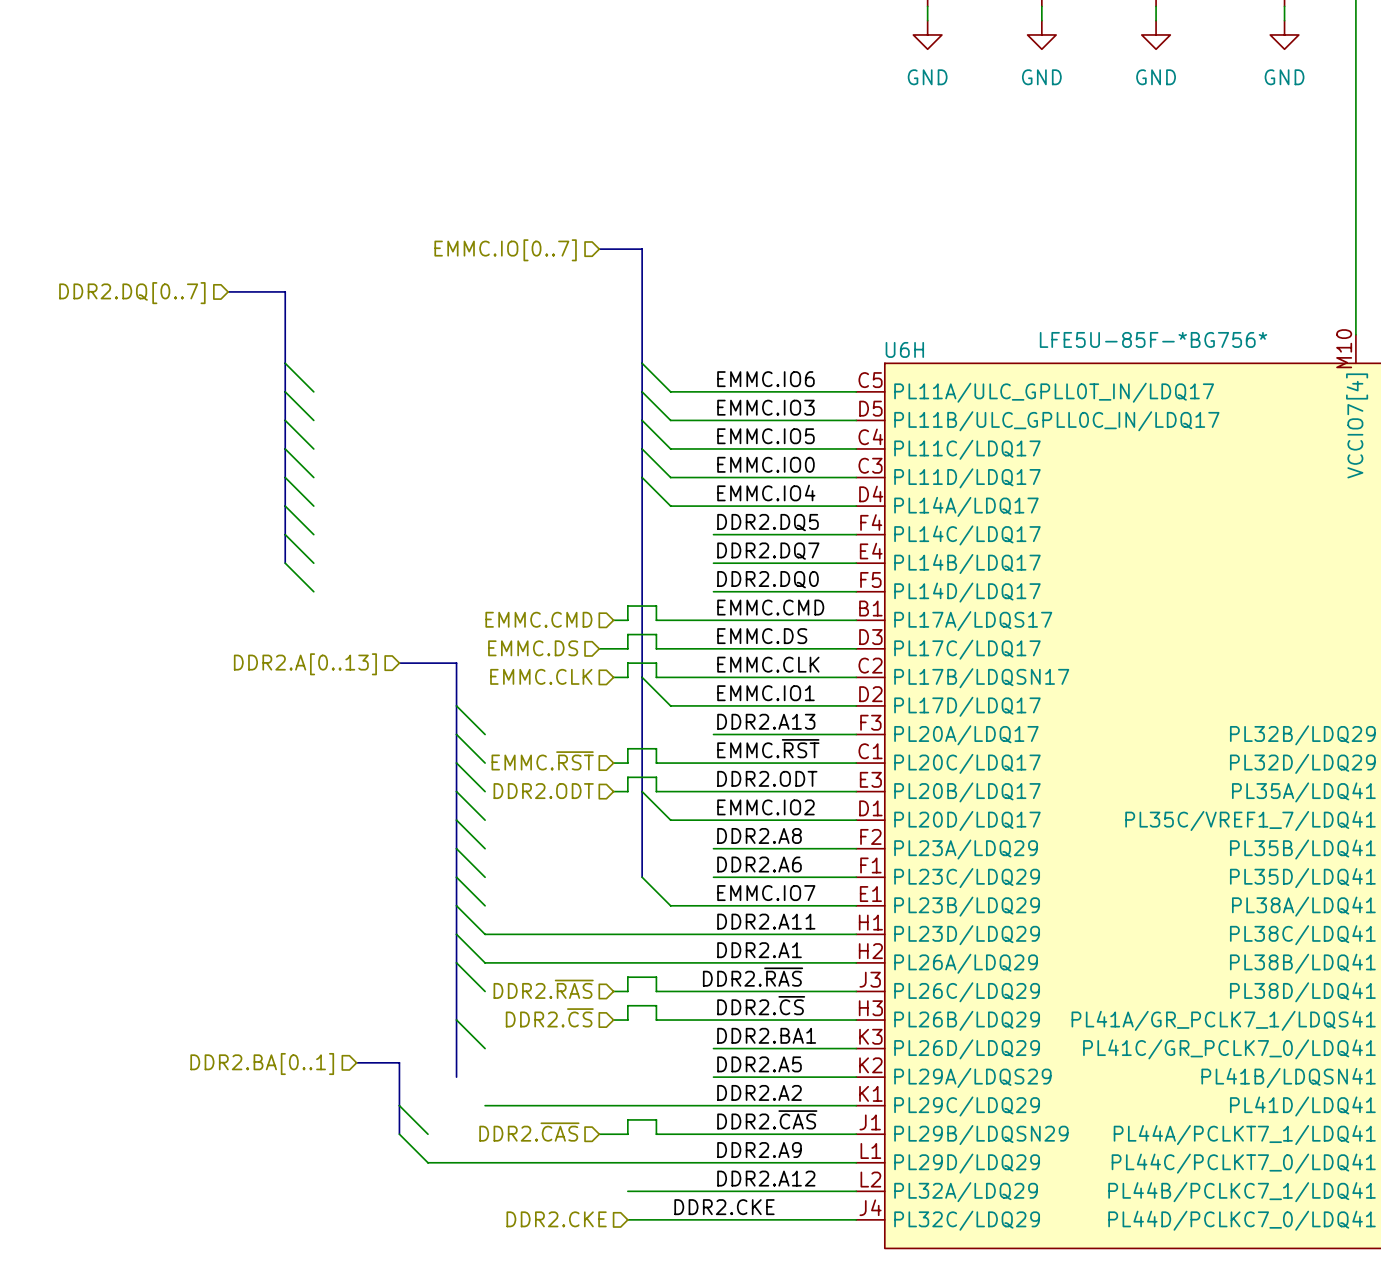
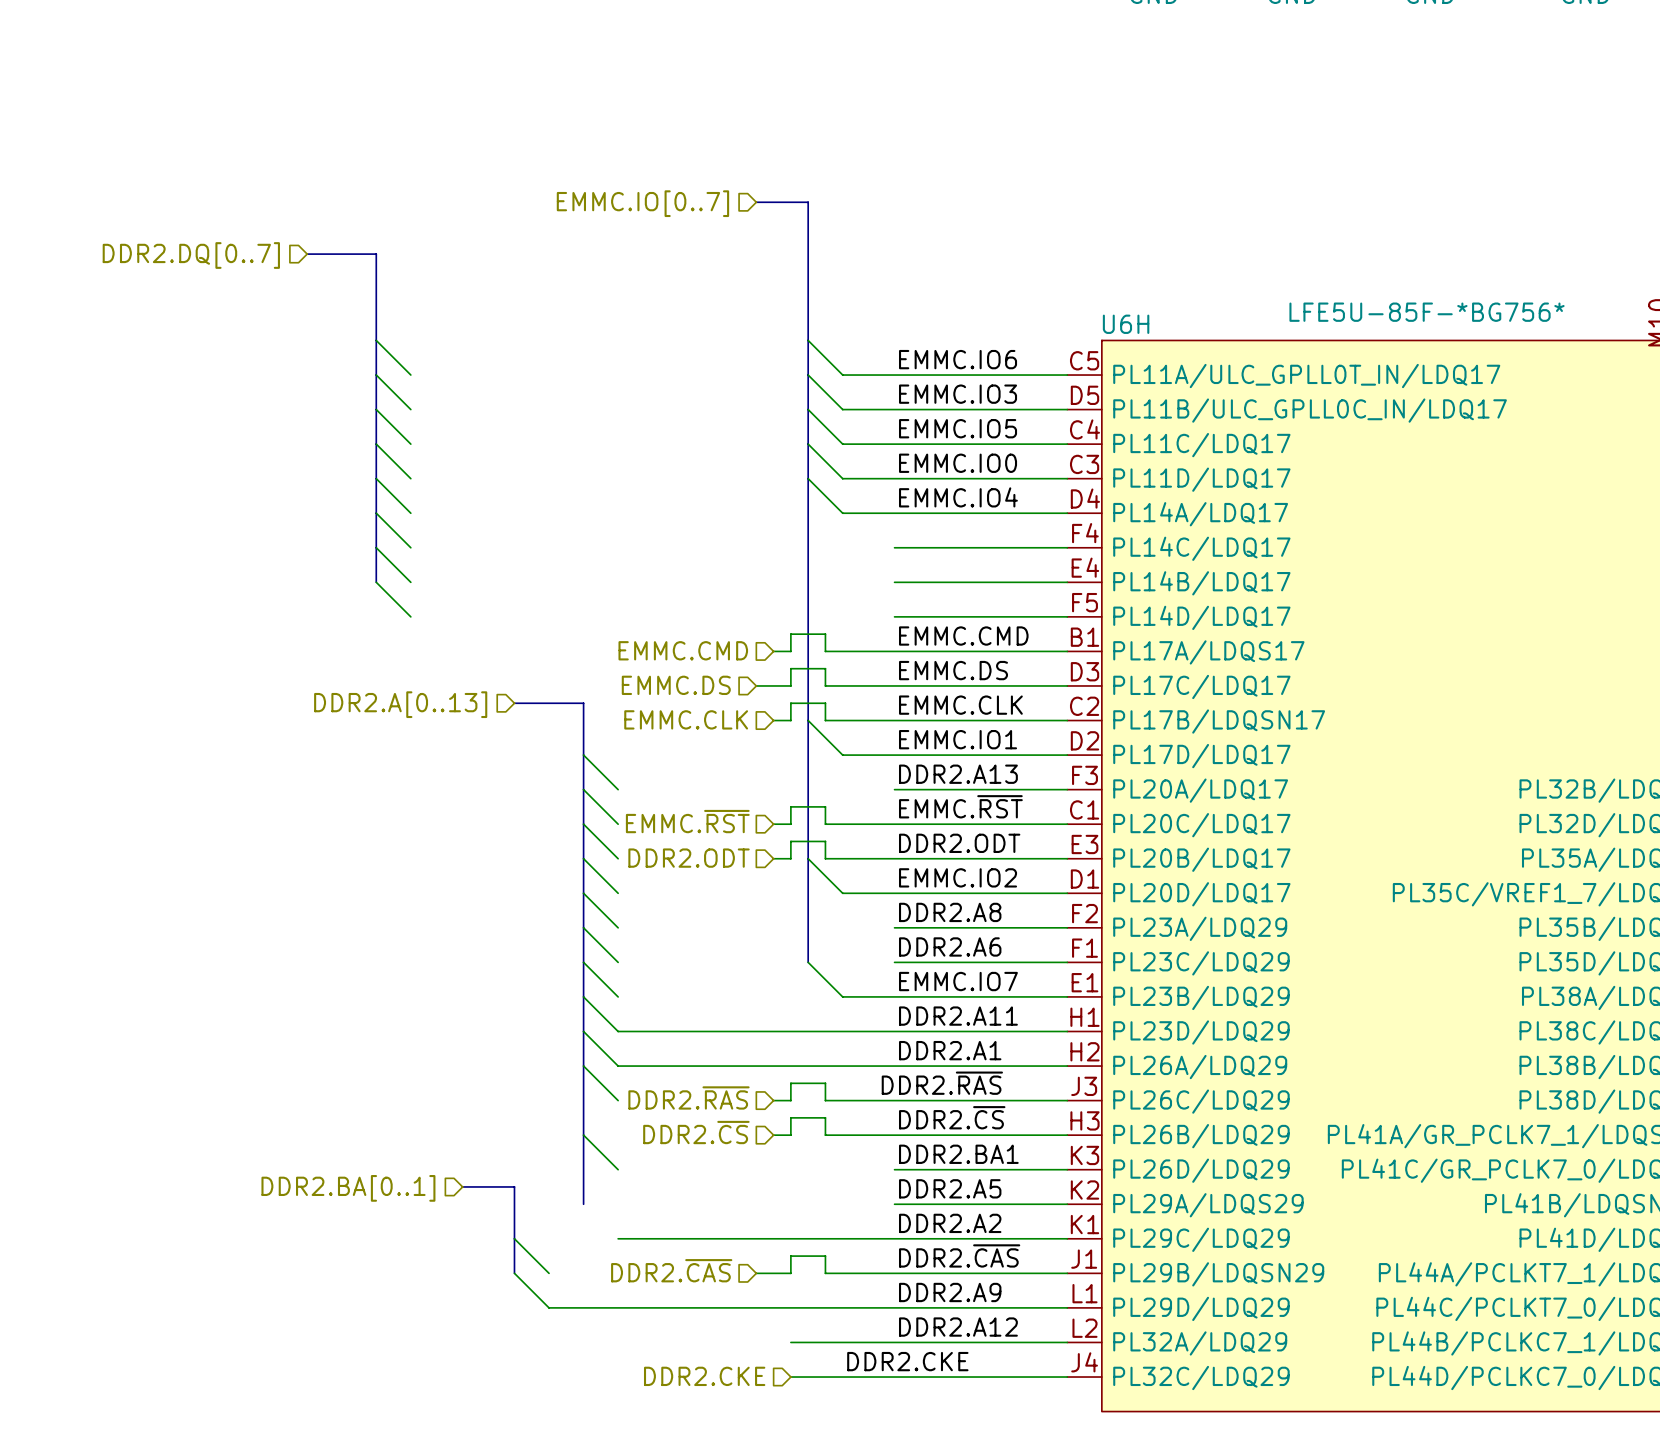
label: DDR2.DQ5 (768, 522) -> none
label: DDR2.DQ7 (768, 551) -> none
label: DDR2.DQ0 (768, 579) -> none

